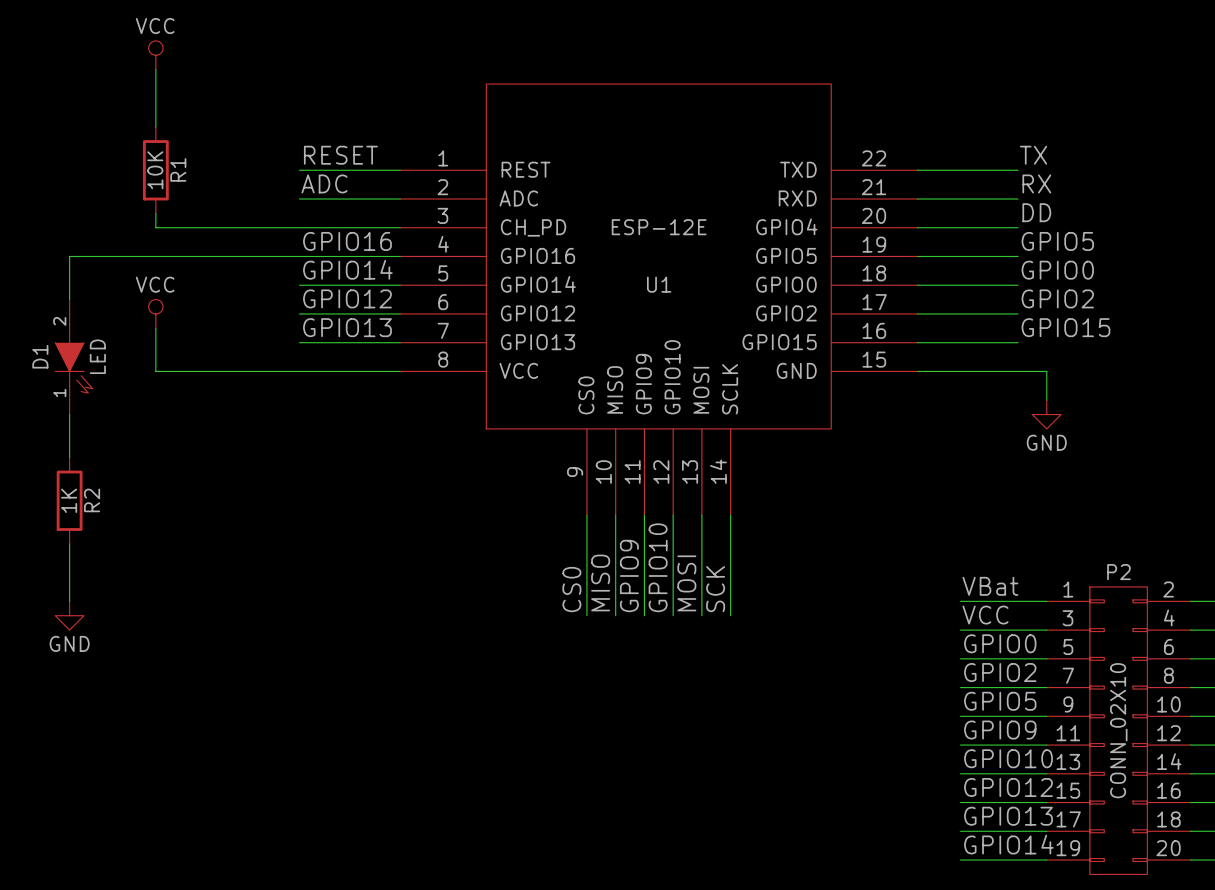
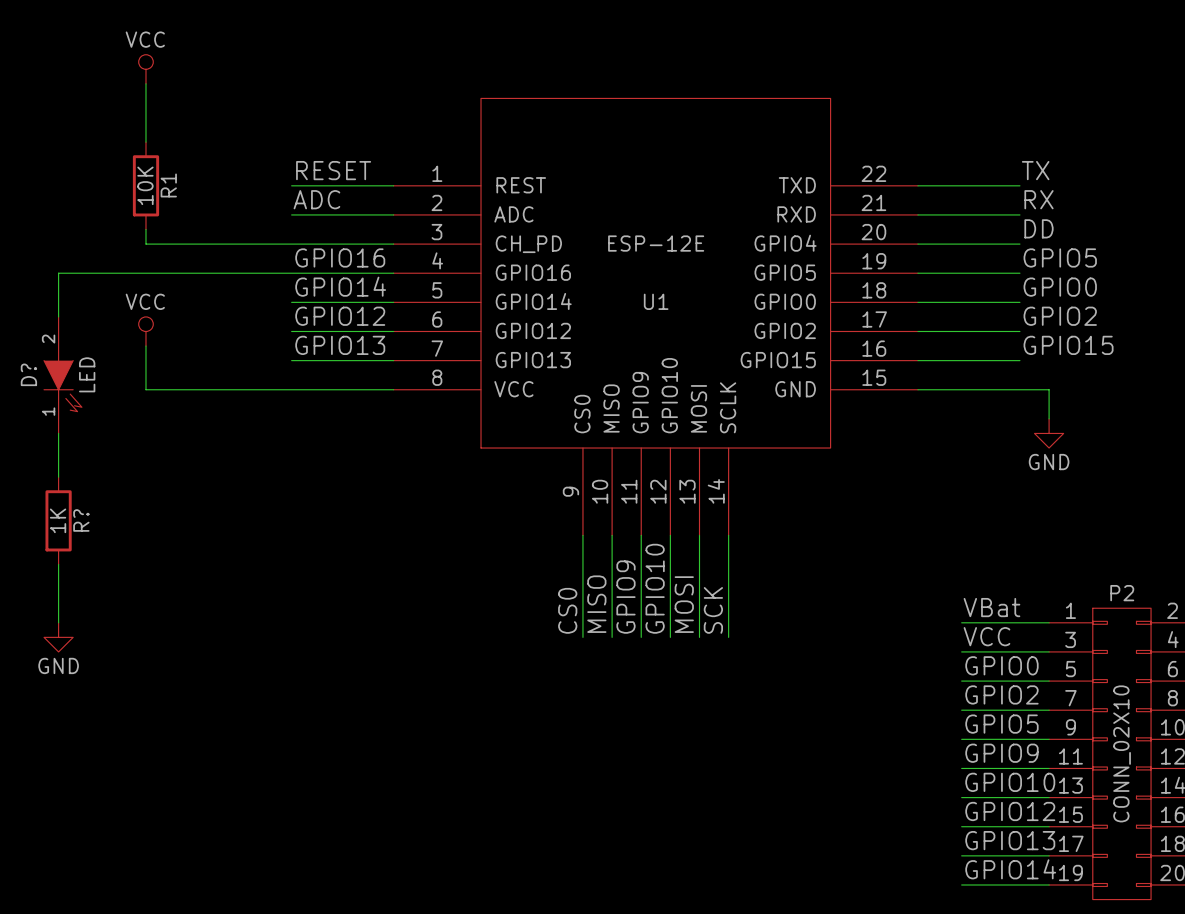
D1 name: D1 (40, 356) -> D? (28, 374)
R2 name: R2 (92, 500) -> R? (81, 520)

